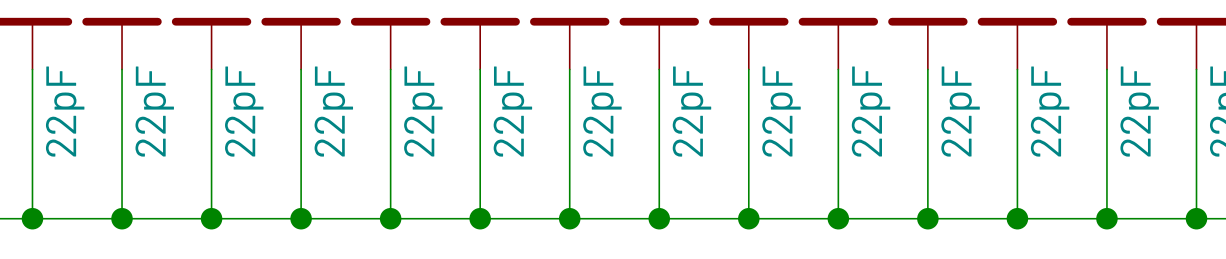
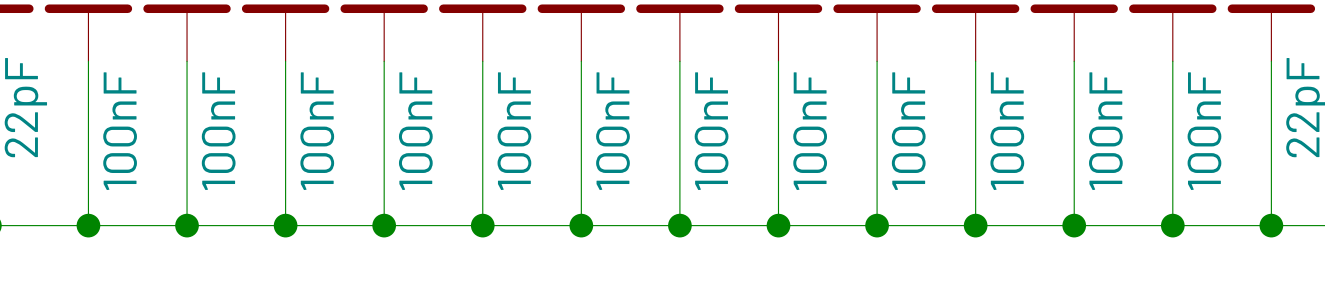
part value: 22pF (65, 111) -> 100nF (120, 131)
part value: 22pF (154, 111) -> 100nF (218, 131)
part value: 22pF (244, 111) -> 100nF (317, 131)
part value: 22pF (333, 111) -> 100nF (415, 131)
part value: 22pF (423, 111) -> 100nF (514, 131)
part value: 22pF (512, 111) -> 100nF (612, 131)
part value: 22pF (602, 111) -> 100nF (711, 131)
part value: 22pF (691, 111) -> 100nF (810, 131)
part value: 22pF (781, 111) -> 100nF (908, 131)
part value: 22pF (871, 111) -> 100nF (1007, 131)
part value: 22pF (960, 111) -> 100nF (1105, 131)
part value: 22pF (1050, 111) -> 100nF (1204, 131)

